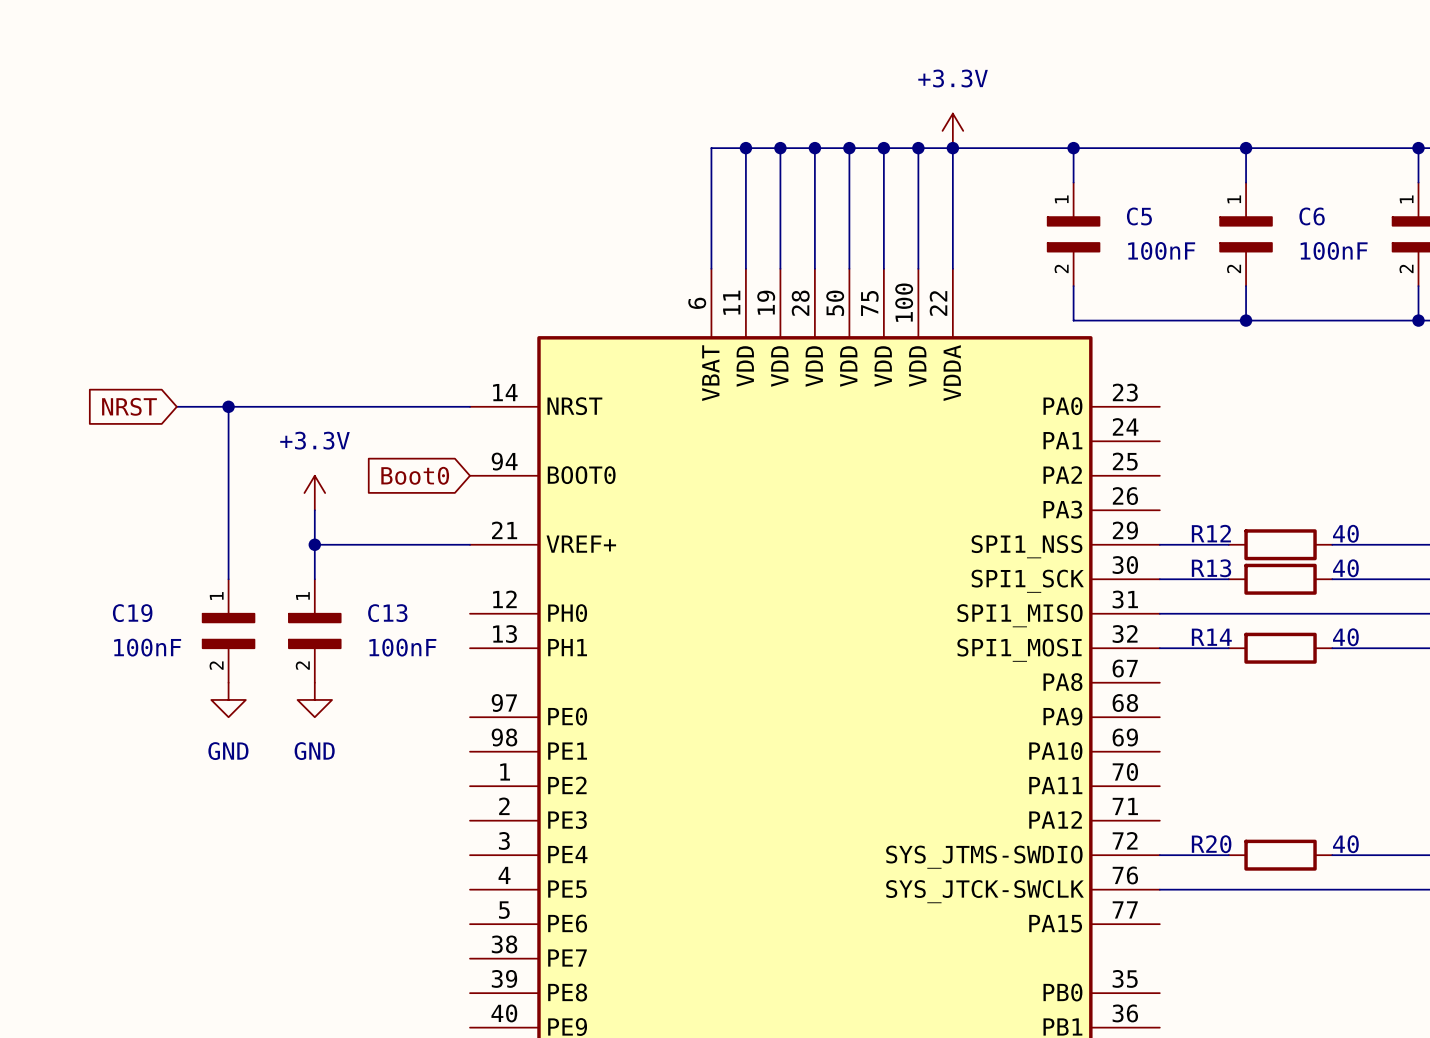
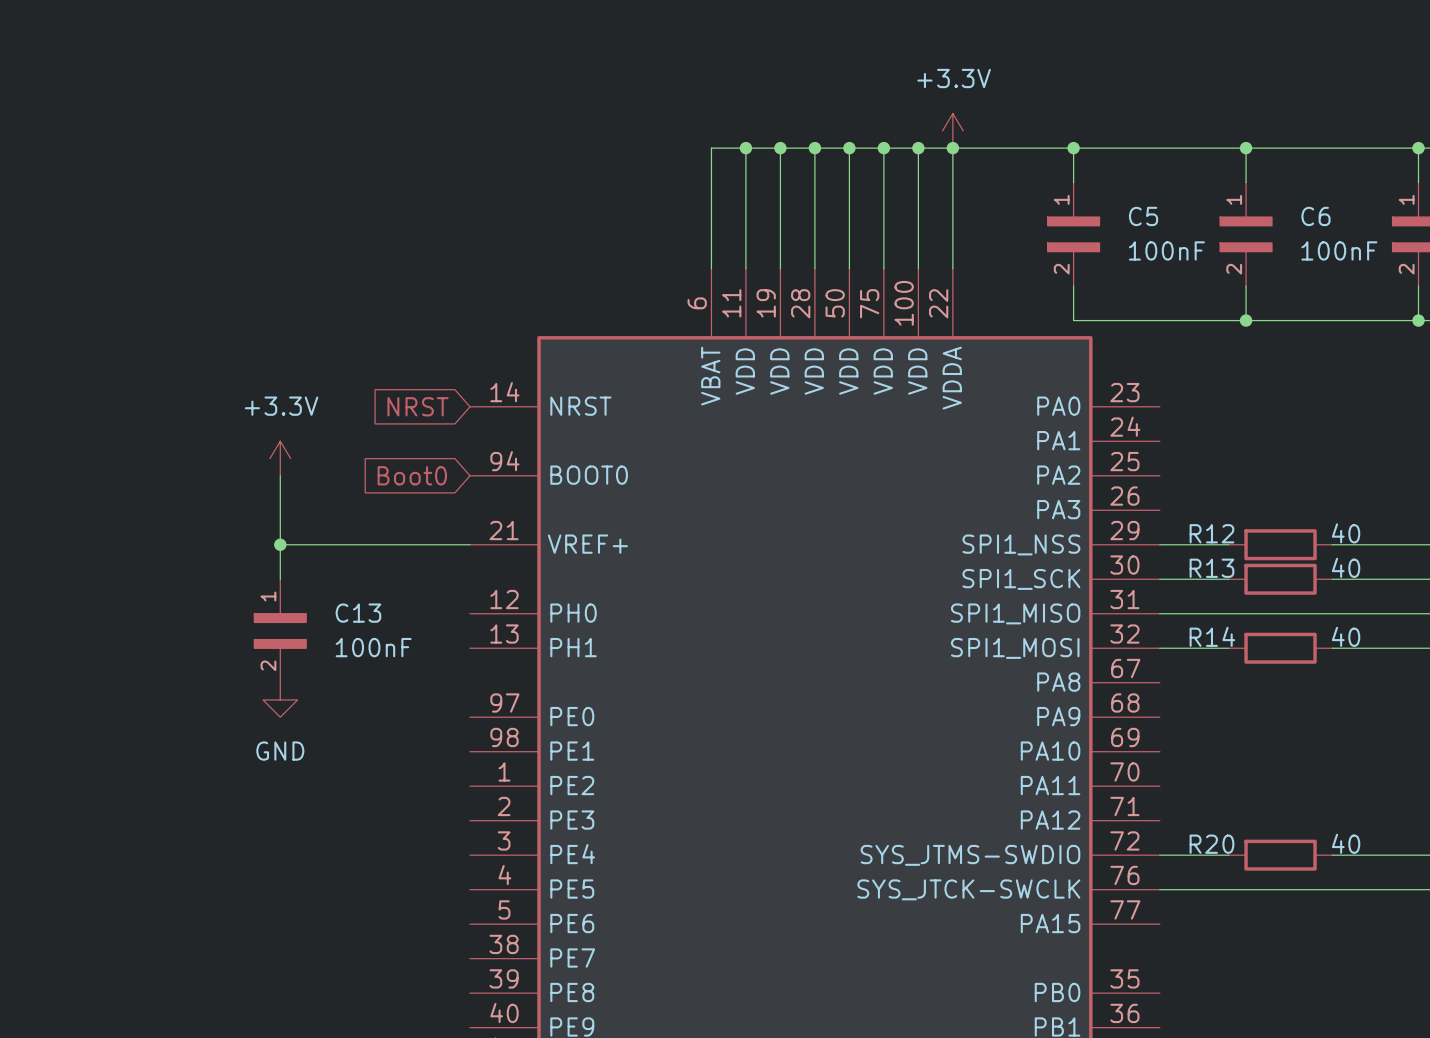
global label position: NRST (129, 406) -> NRST (418, 406)
wire: (176, 406) (470, 406) -> none
wire: (228, 406) (228, 579) -> none
junction: (228, 406) -> none
wire: none -> (280, 475) (280, 579)
power symbol position: +3.3V (314, 493) -> +3.3V (280, 458)
wire: (314, 510) (314, 579) -> none
wire: none -> (280, 544) (314, 544)
junction position: (314, 544) -> (280, 544)
C19: 100nF (228, 630) -> none
C13 position: (314, 630) -> (280, 630)
power symbol: GND (228, 699) -> none
power symbol: none -> GND (280, 699)
power symbol: GND (314, 699) -> none

